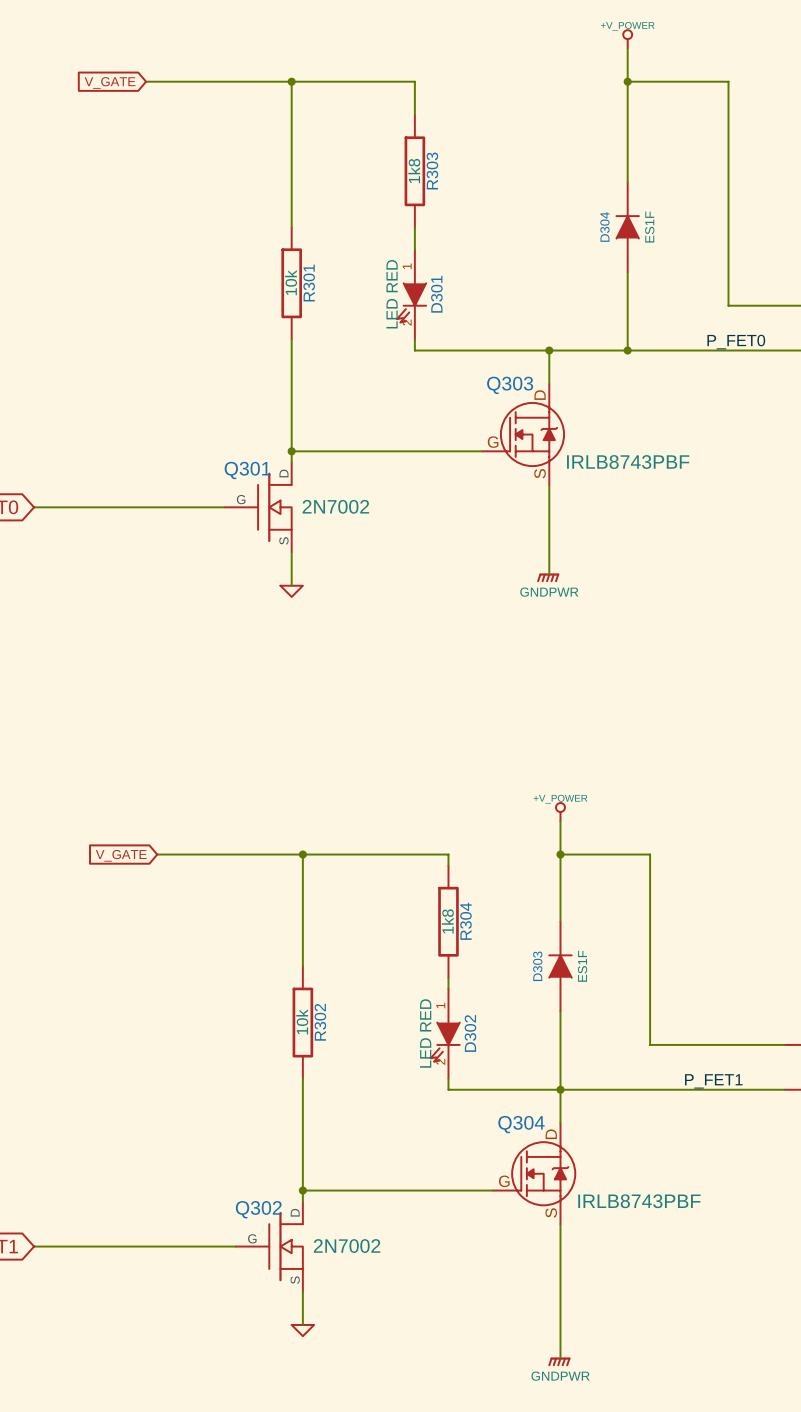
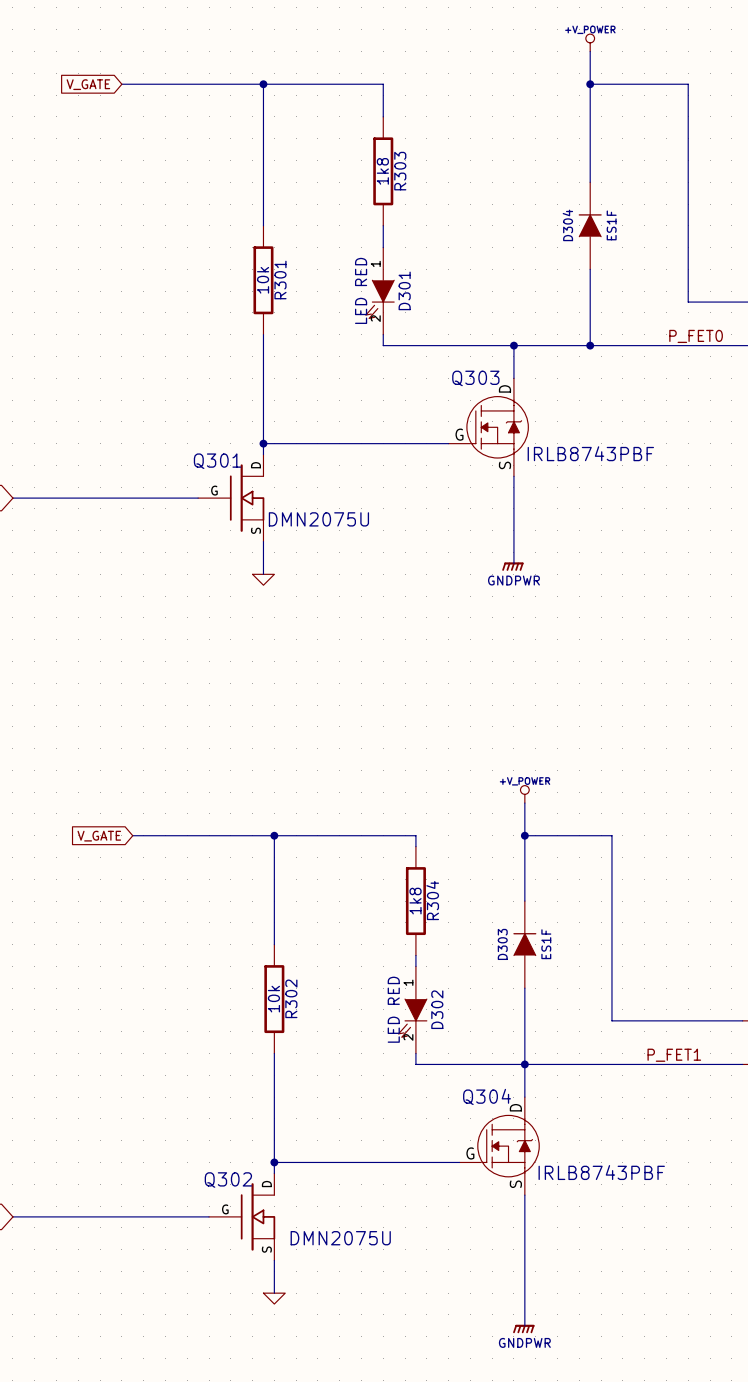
Q301 value: 2N7002 (335, 506) -> DMN2075U (318, 519)
Q302 value: 2N7002 (347, 1246) -> DMN2075U (340, 1238)

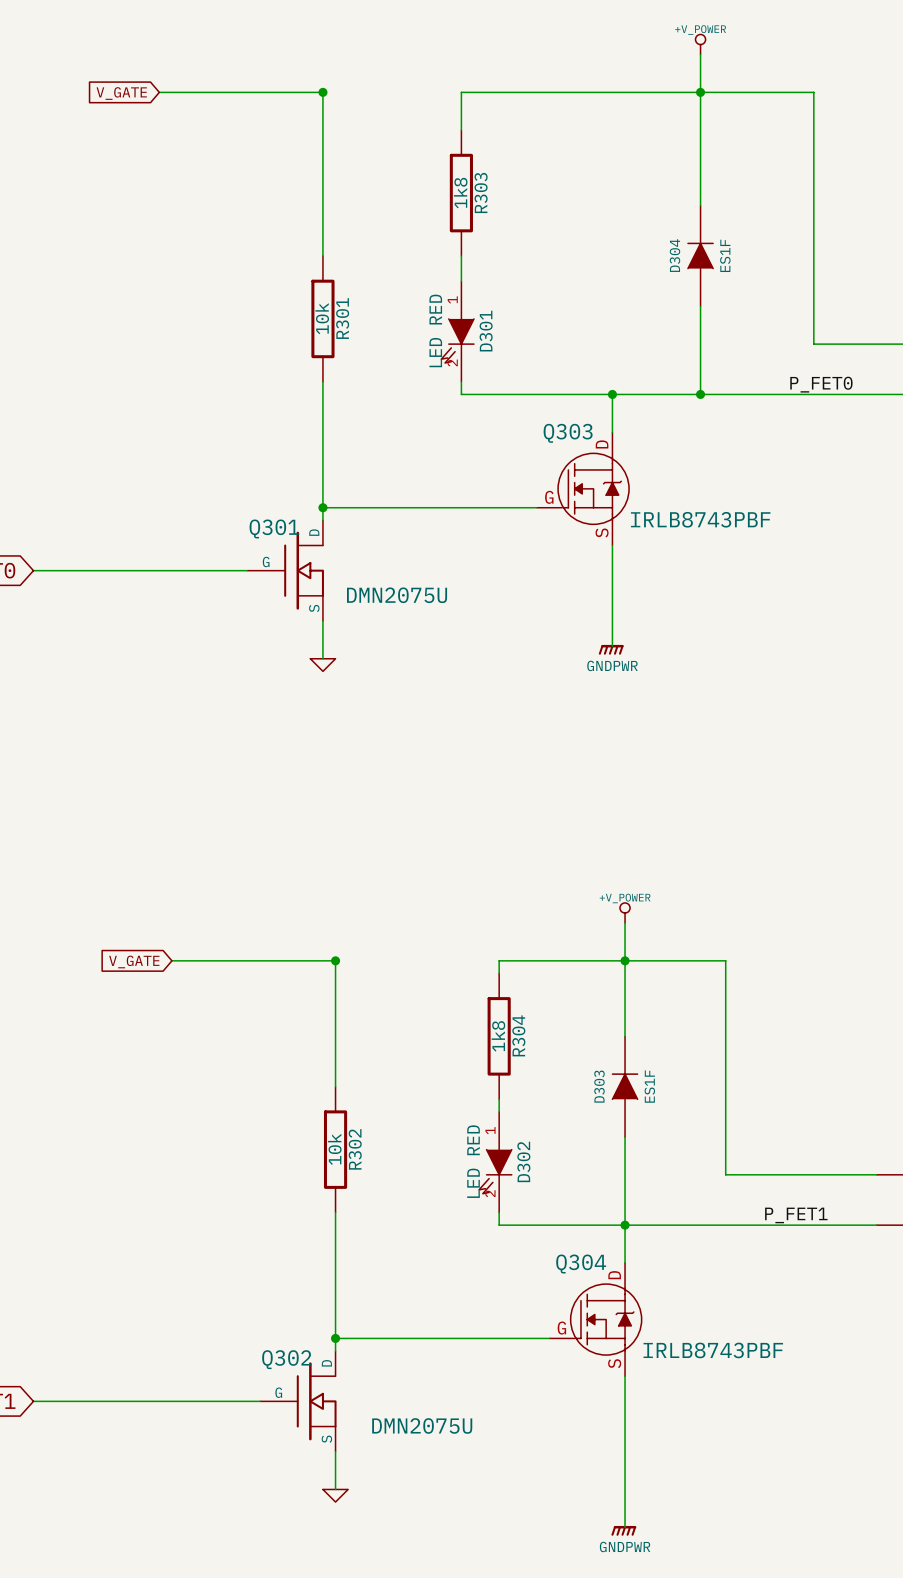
wire: (263, 84) (383, 84) -> (700, 92) (461, 92)
wire: (274, 835) (415, 835) -> (625, 960) (499, 960)

